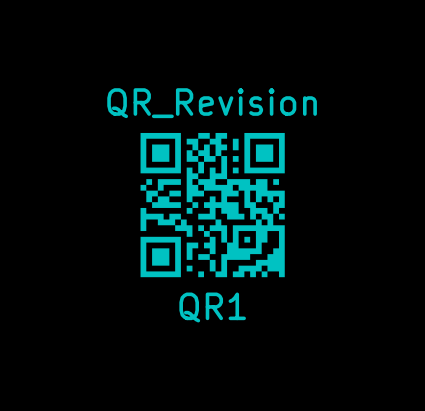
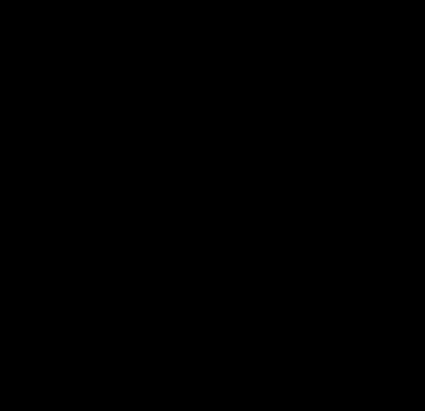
QR1: QR_Revision (212, 205) -> none

